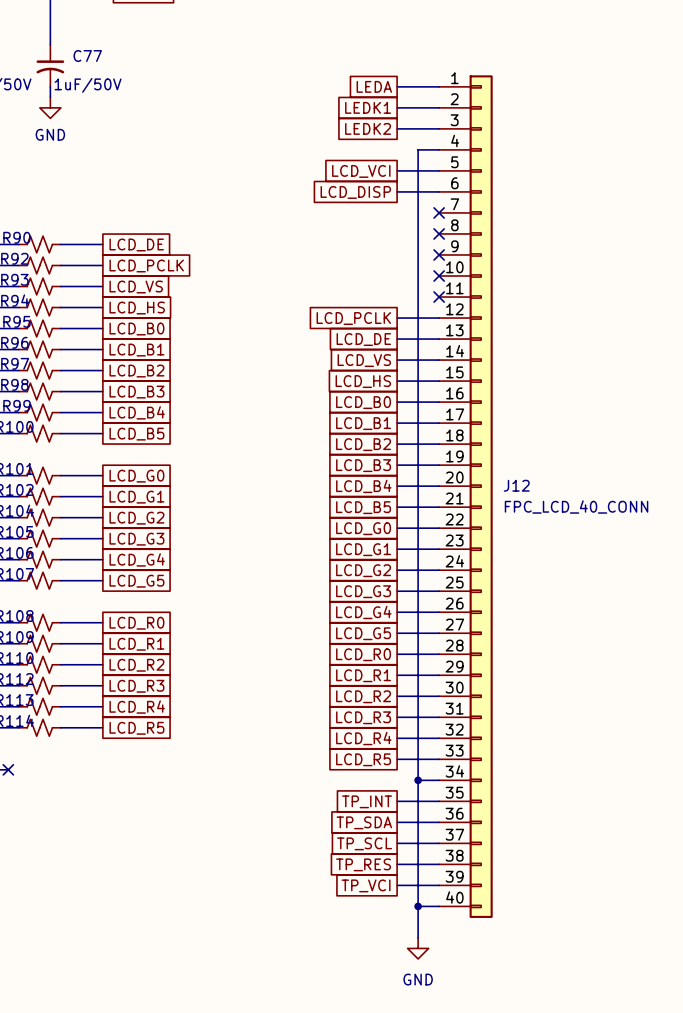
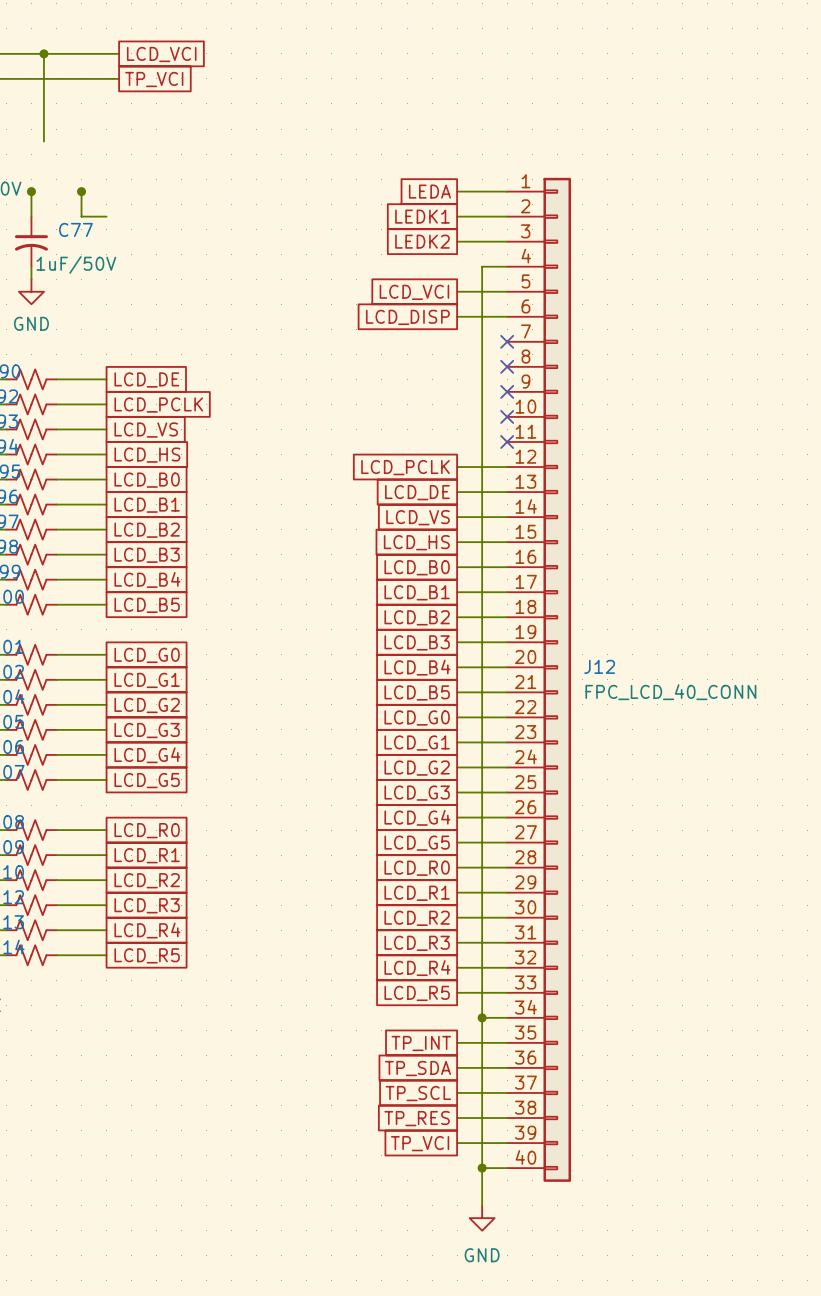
C77 position: (50, 65) -> (31, 241)
wire: none -> (31, 191) (31, 216)
junction: none -> (31, 191)
wire: (50, 86) (50, 97) -> (31, 266) (31, 279)
wire: none -> (81, 191) (81, 216) (106, 216)
junction: none -> (81, 191)
power symbol position: GND (50, 107) -> GND (31, 291)

